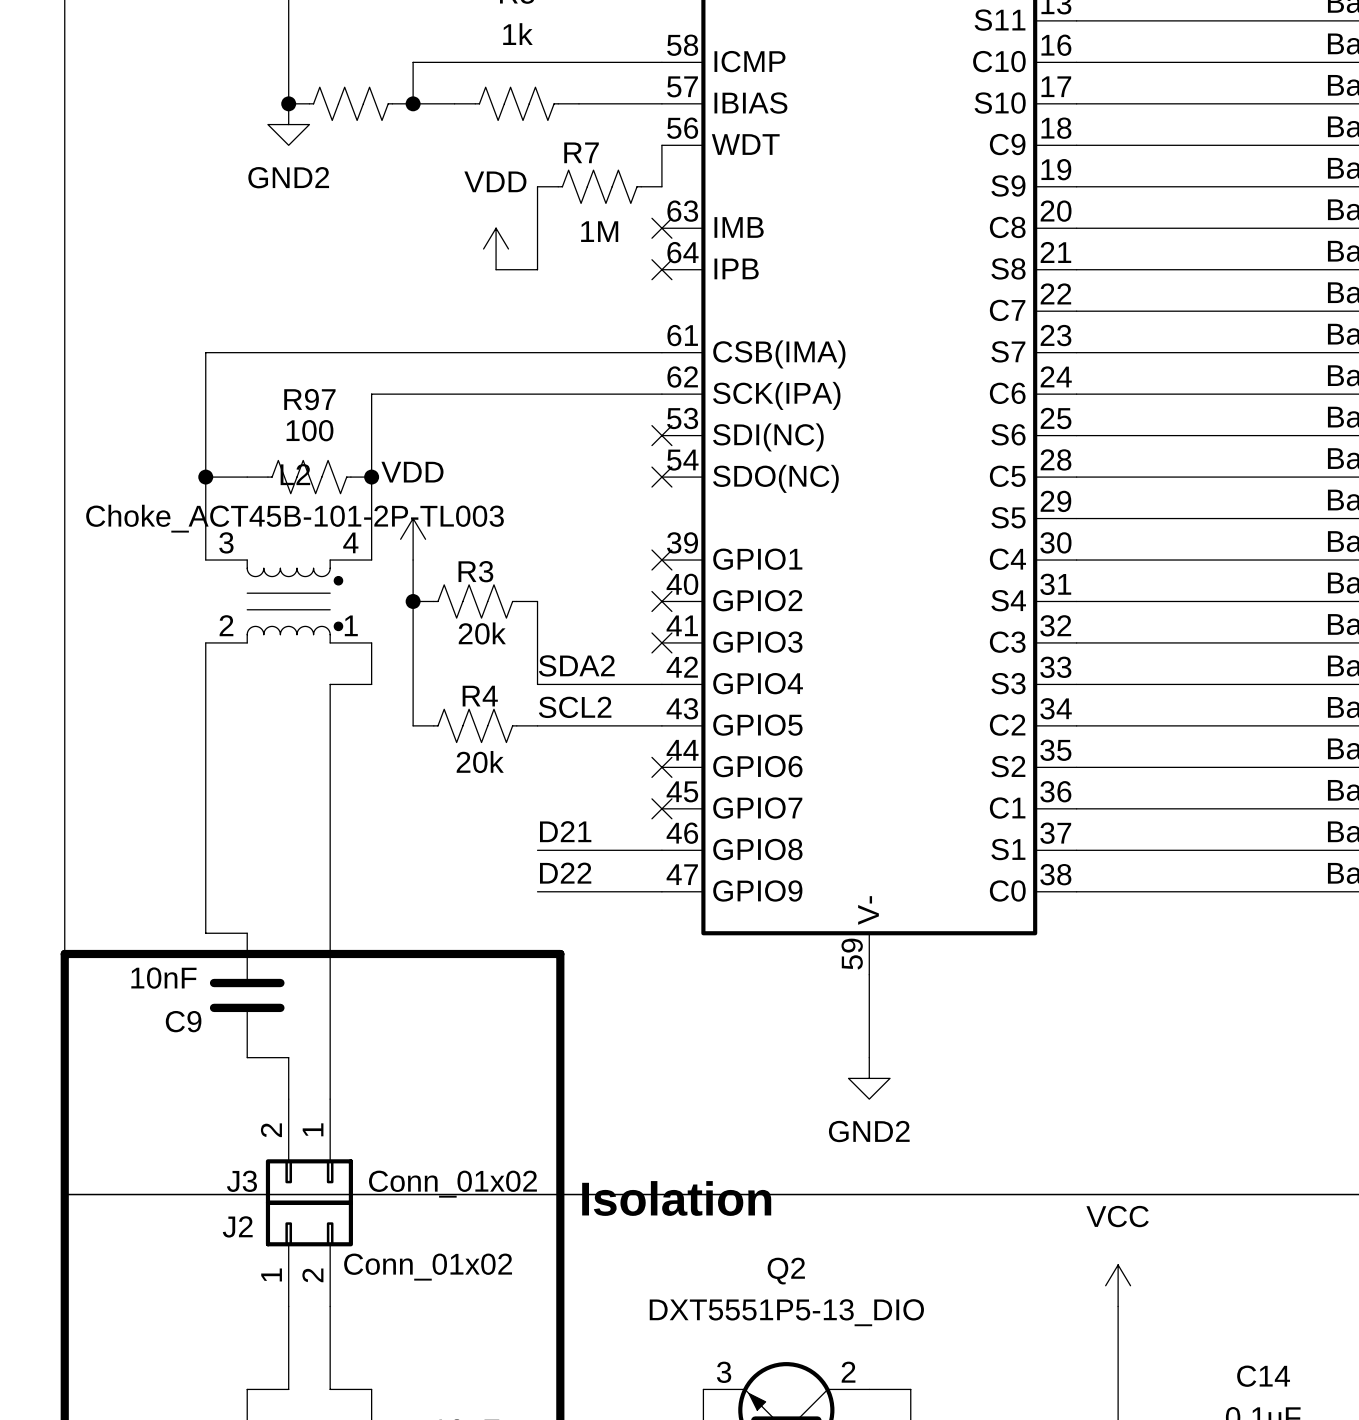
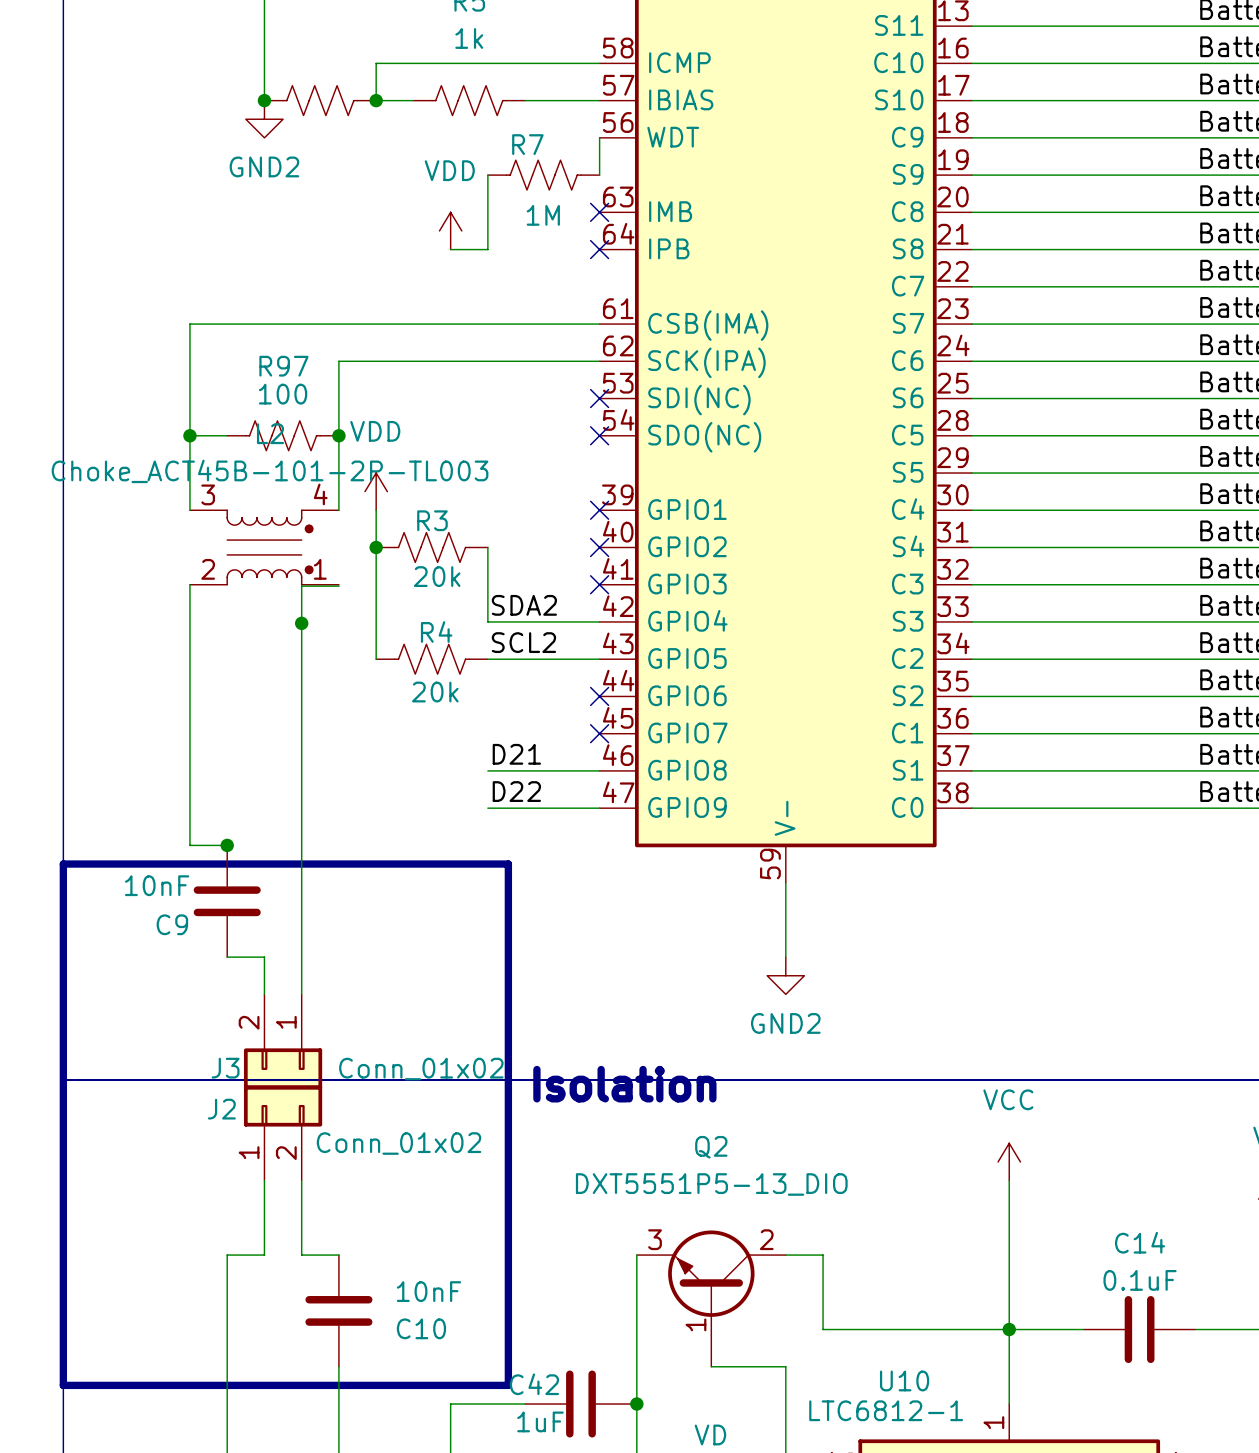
wire: (371, 642) (371, 684) (330, 684) -> (339, 586) (301, 586) (301, 621)
junction: none -> (301, 623)
junction: none -> (227, 845)

